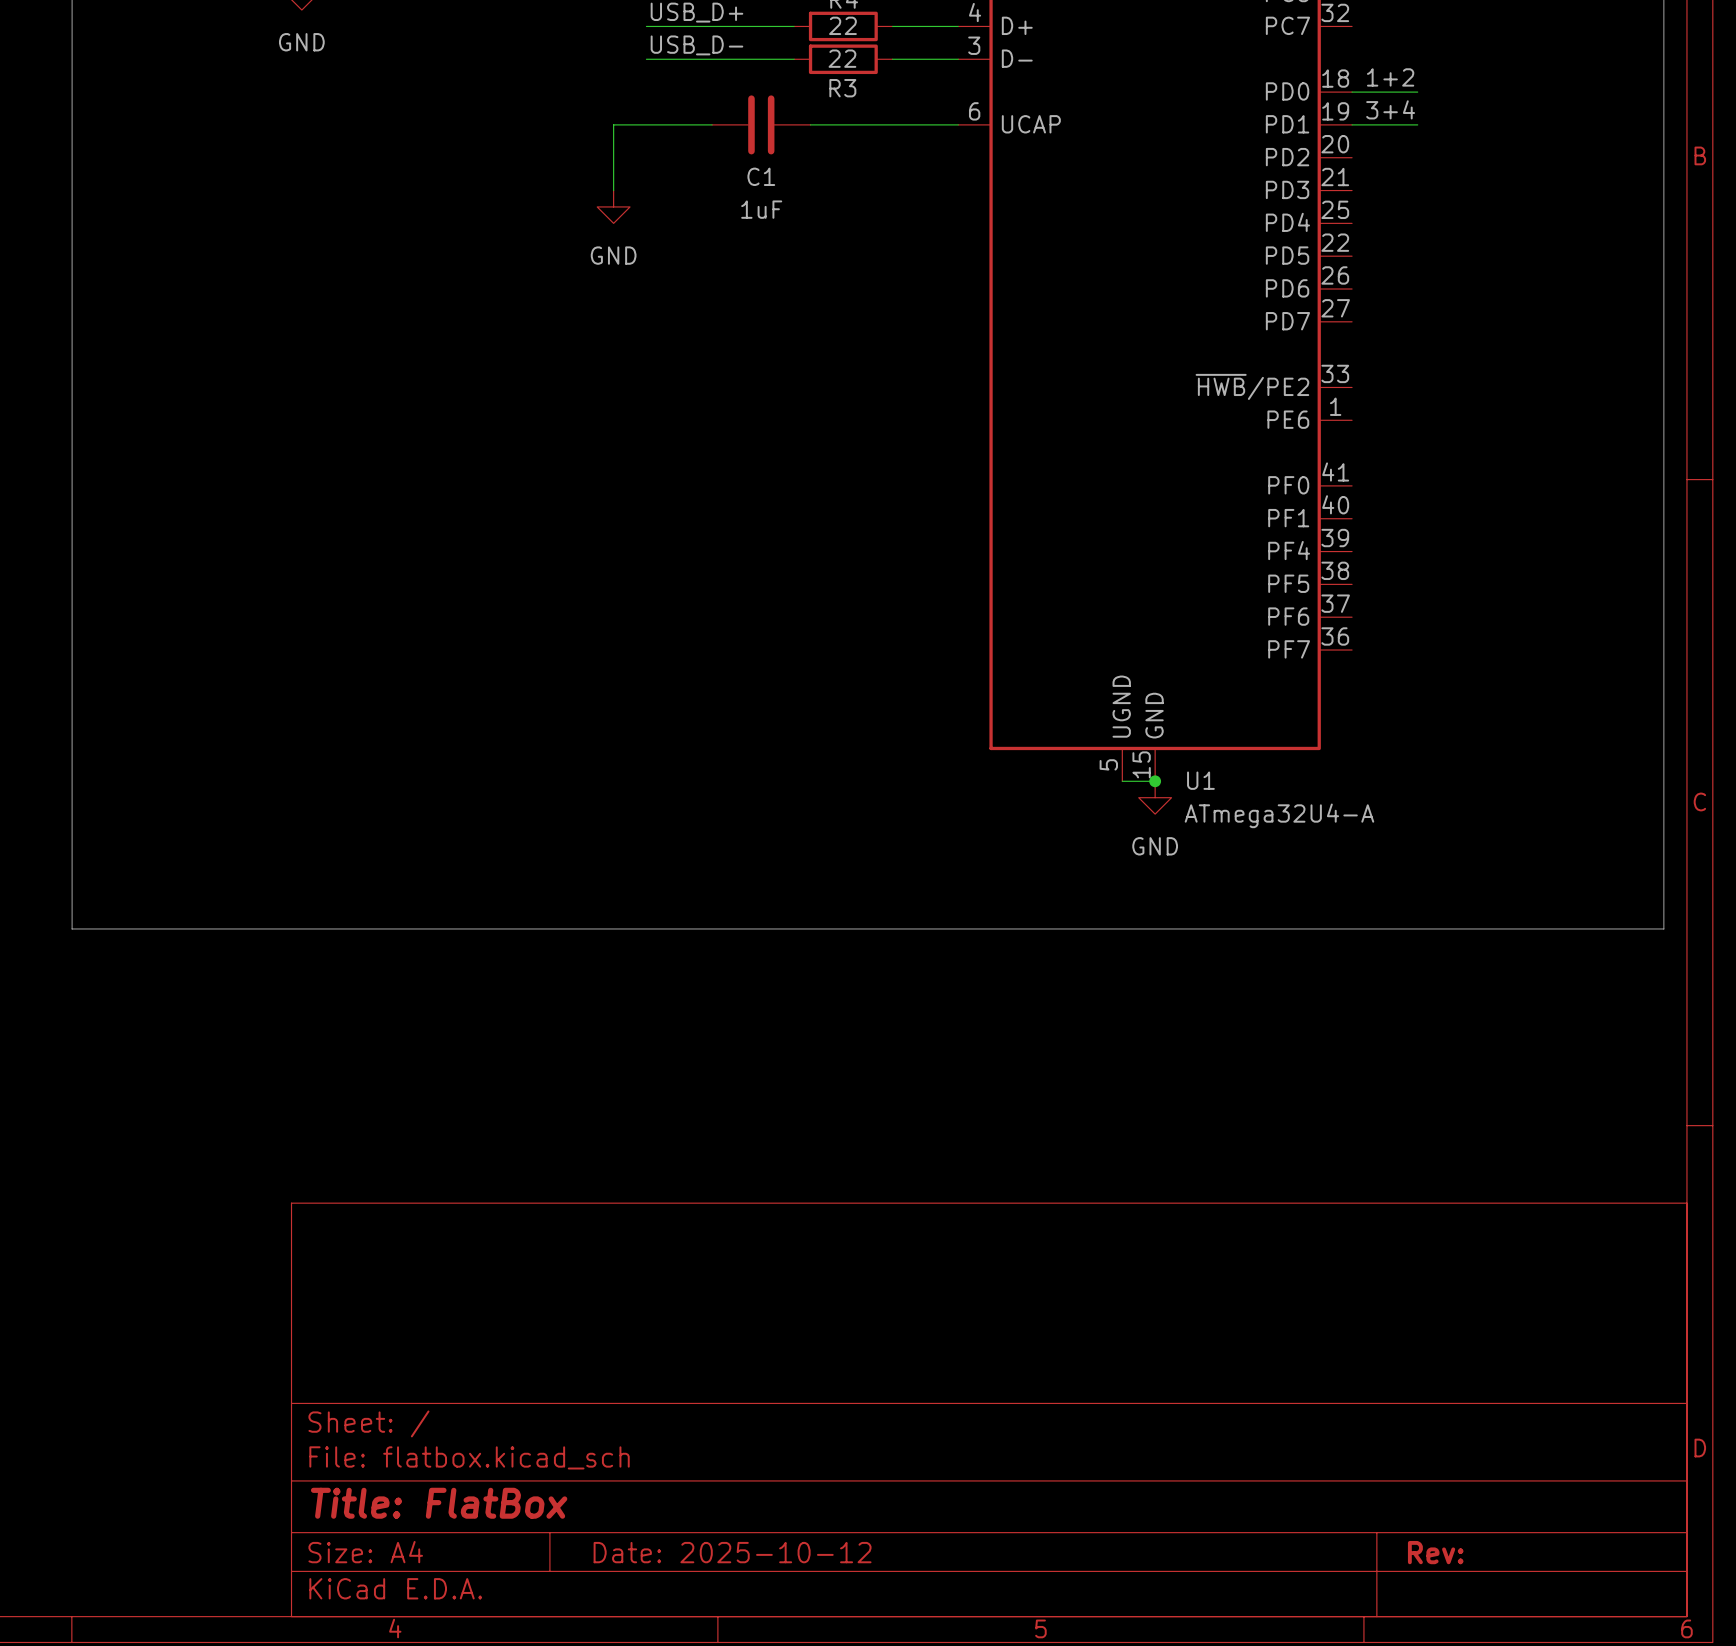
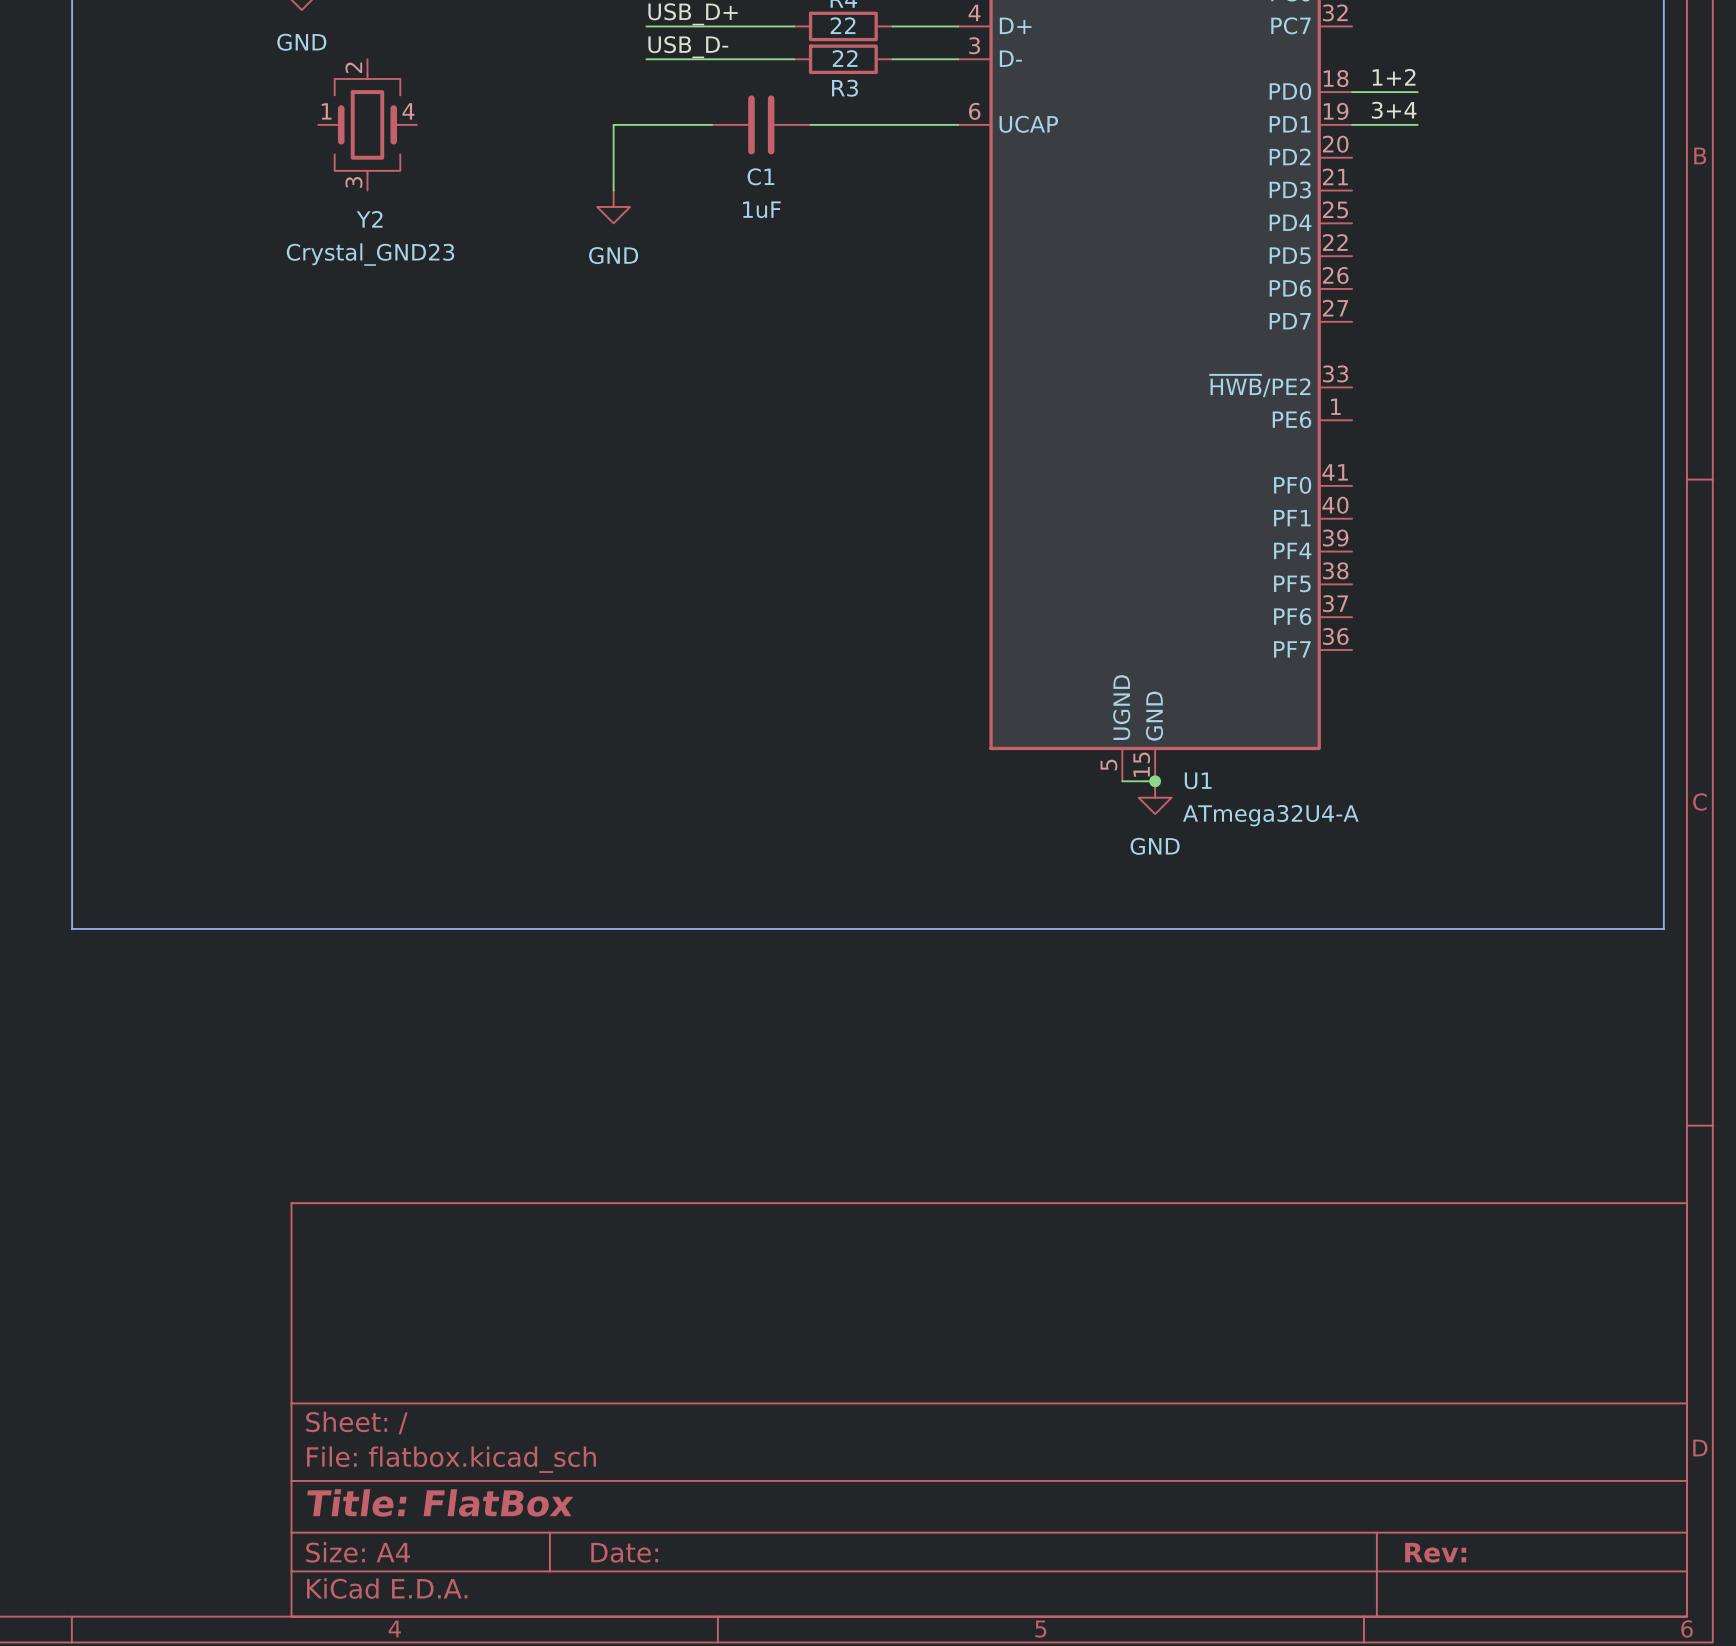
Y2: none -> Crystal_GND23 (367, 124)
title block: Date: 2025-10-12 (732, 1552) -> Date: (624, 1552)

